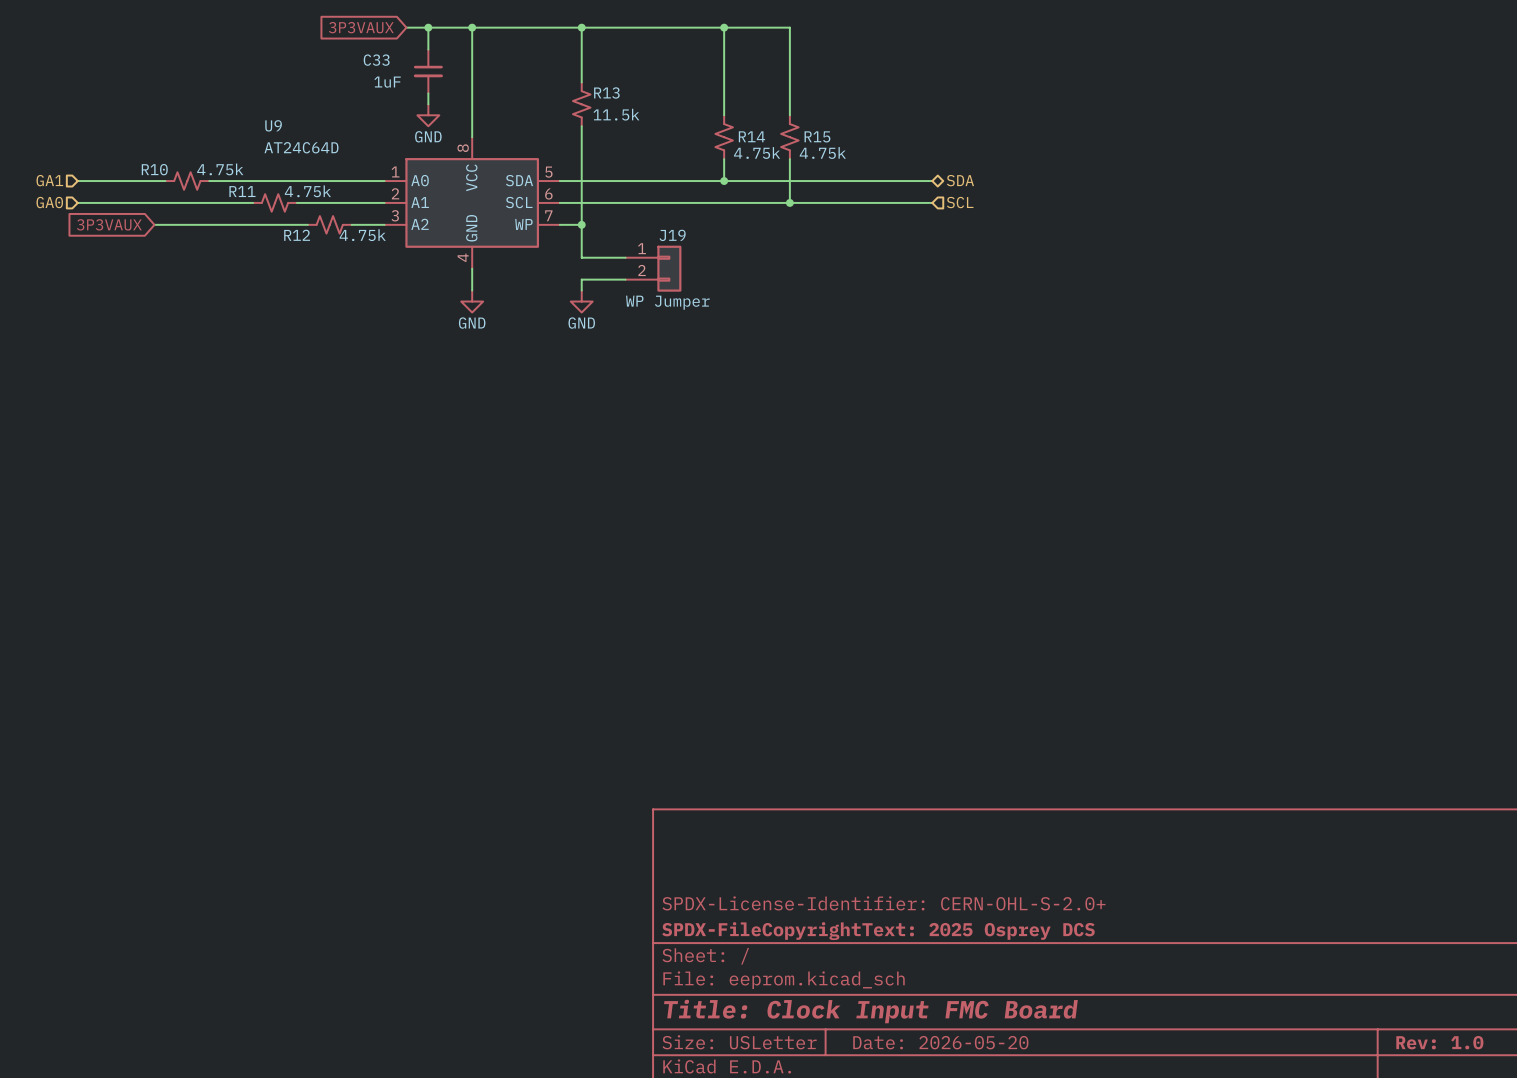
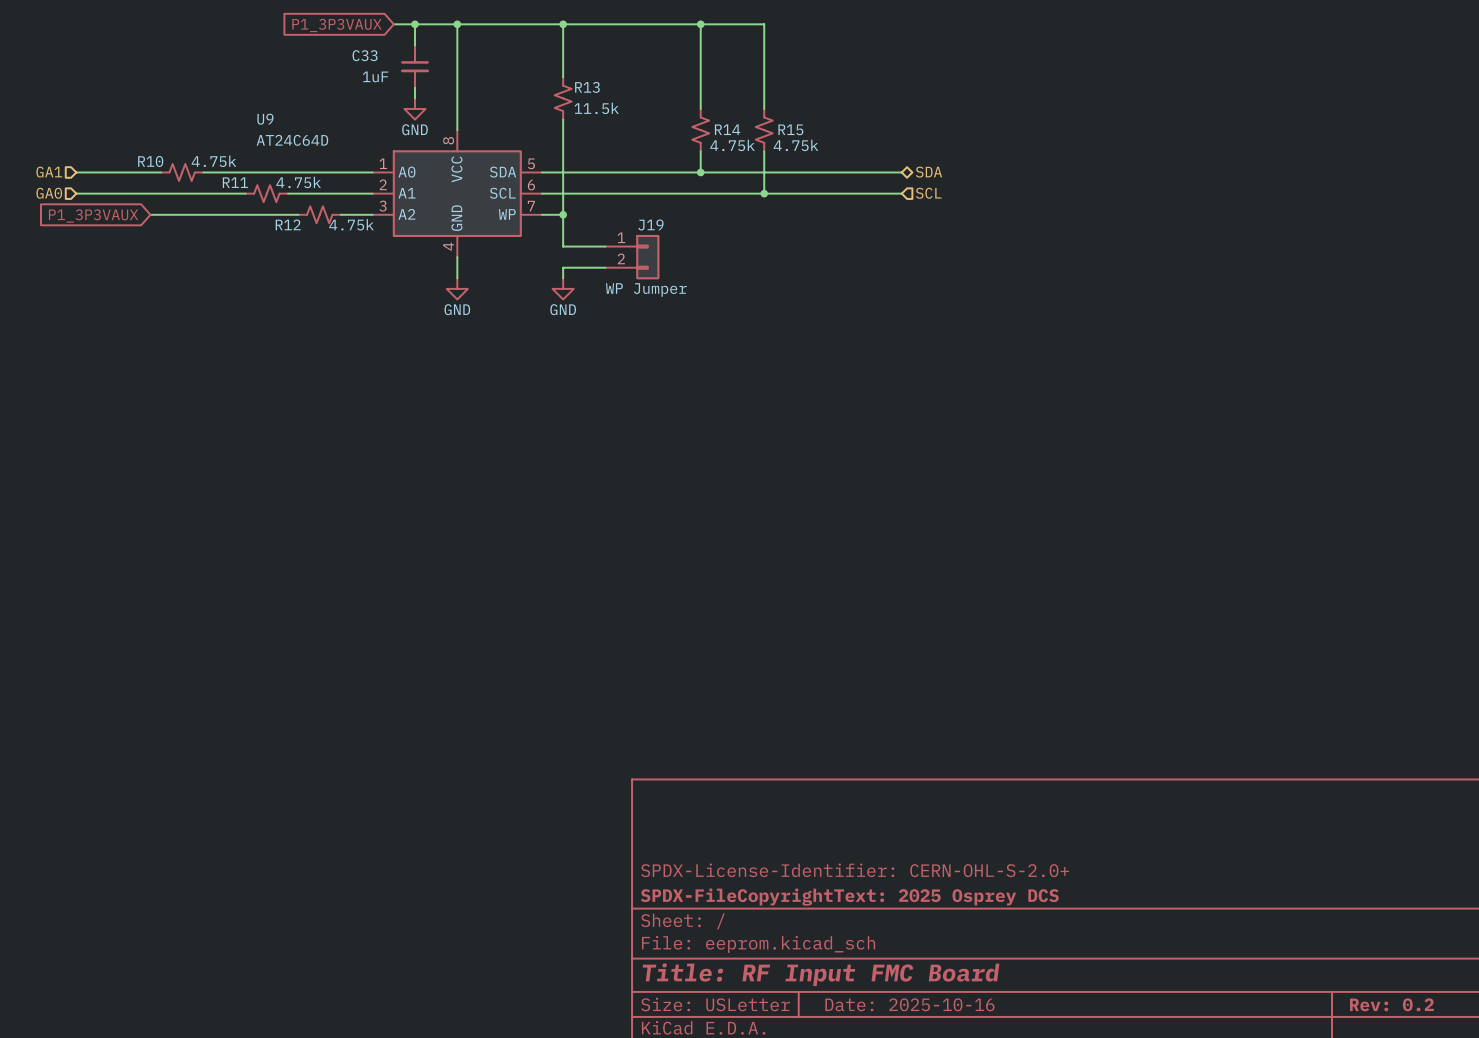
global label: 3P3VAUX (361, 27) -> P1_3P3VAUX (336, 25)
global label: 3P3VAUX (109, 224) -> P1_3P3VAUX (93, 216)
title block: Title: Clock Input FMC Board (870, 1011) -> Title: RF Input FMC Board (821, 974)
title block: Date: 2026-05-20 (940, 1042) -> Date: 2025-10-16 (909, 1004)
title block: Rev: 1.0 (1439, 1042) -> Rev: 0.2 (1391, 1004)

